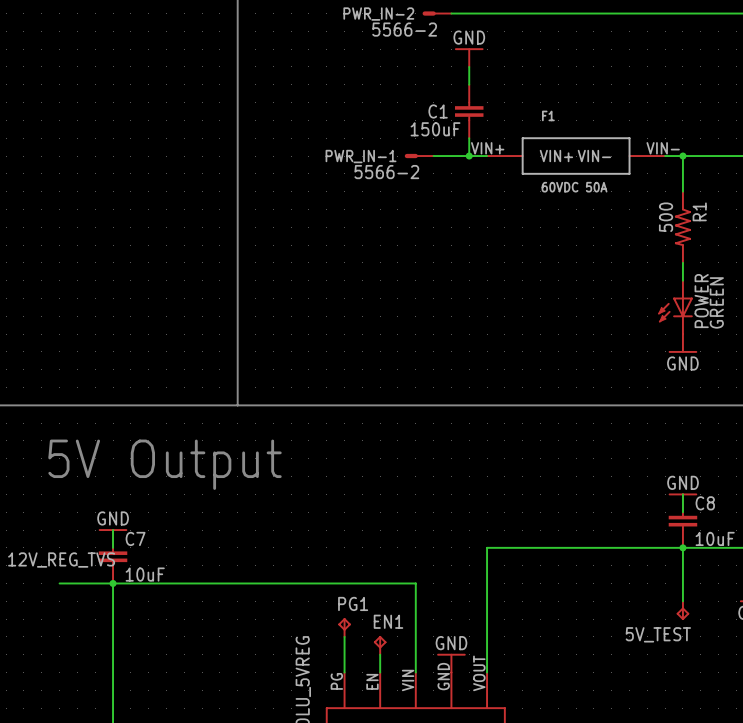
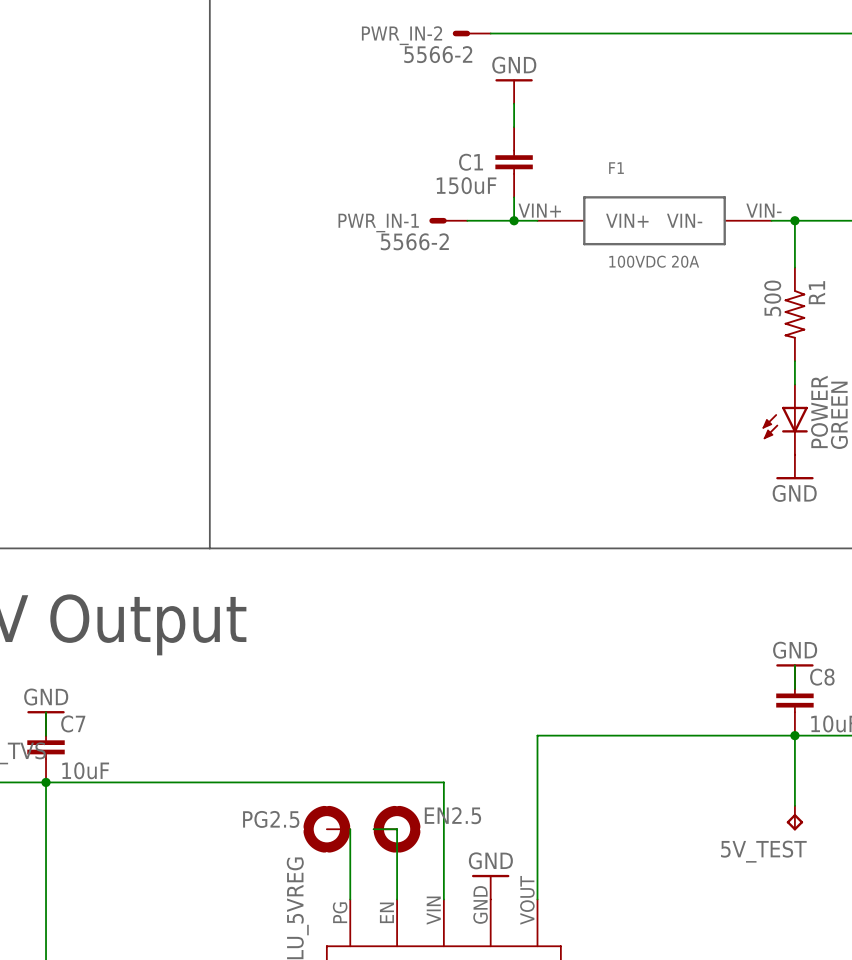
F1 value: 60VDC 50A (574, 187) -> 100VDC 20A (654, 261)
PG2.5: none -> (326, 829)
wire: none -> (373, 829) (397, 829) (397, 876)
EN2.5: none -> (397, 829)
PG1: (344, 627) -> none
EN1: (380, 645) -> none

